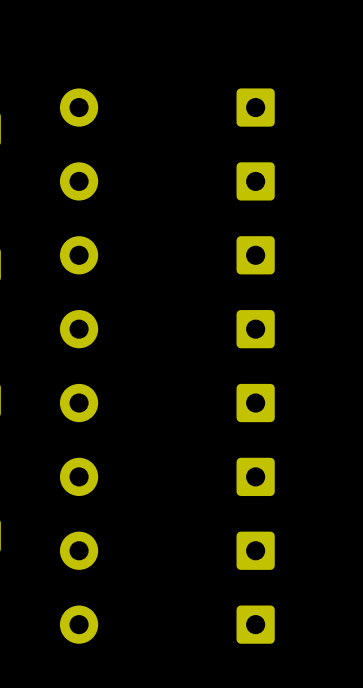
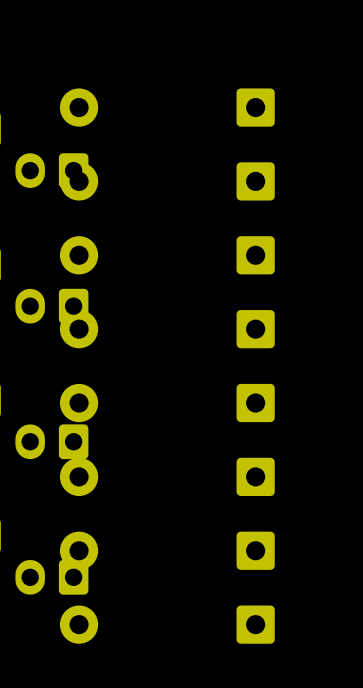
part: none -> (51, 170)
part: none -> (51, 306)
part: none -> (51, 441)
part: none -> (51, 577)

